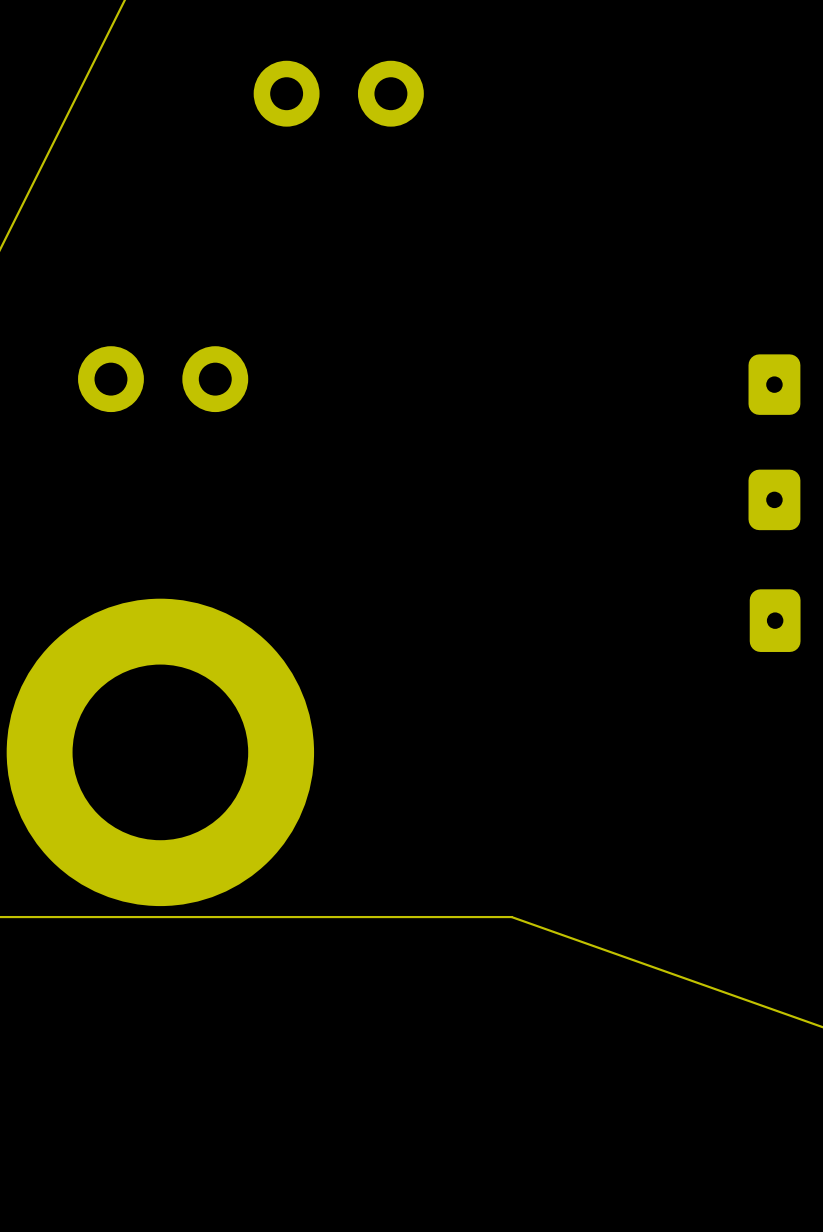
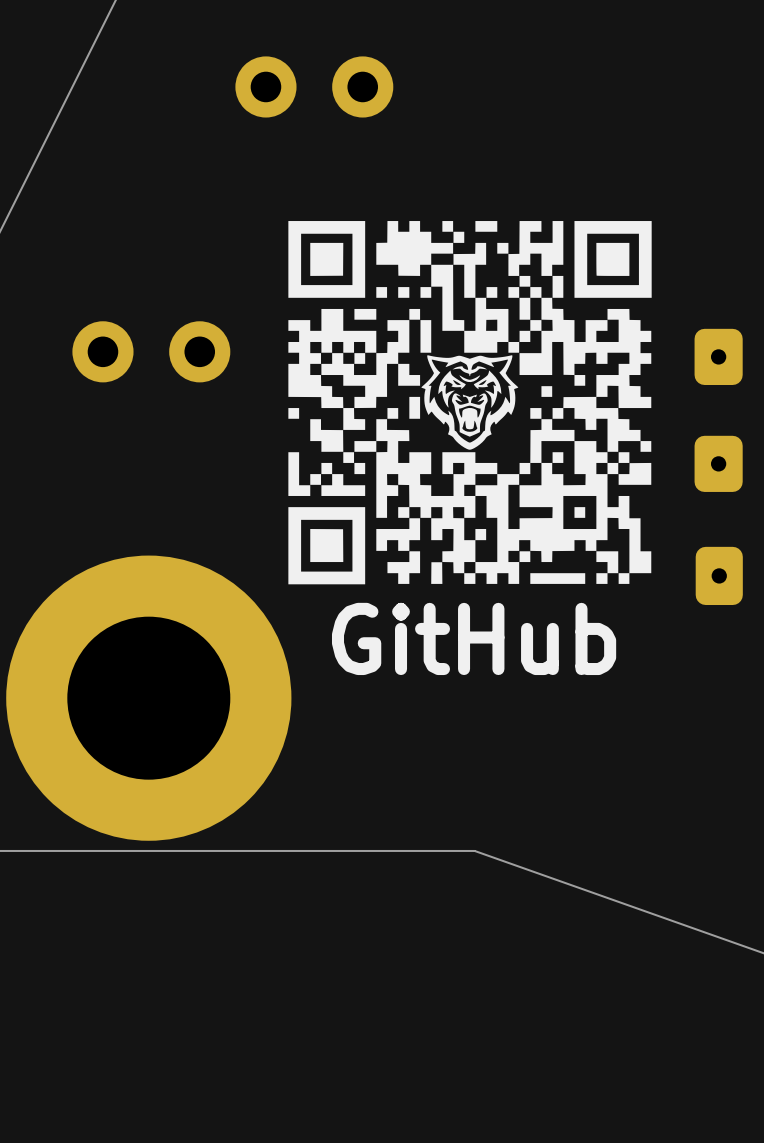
drawing: none -> [288, 221, 652, 585]
text: none -> GitHub (474, 638)

